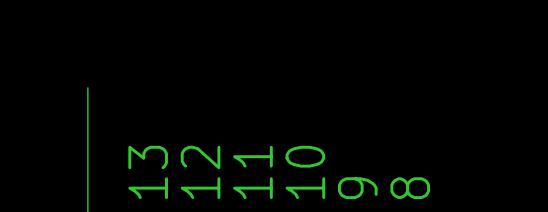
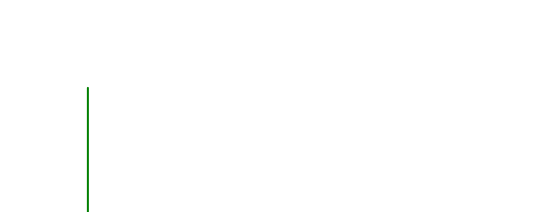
text: 13 (148, 172) -> none
text: 12 (200, 172) -> none
text: 11 (252, 172) -> none
text: 10 (305, 172) -> none
text: 9 (357, 188) -> none
text: 8 (410, 188) -> none

